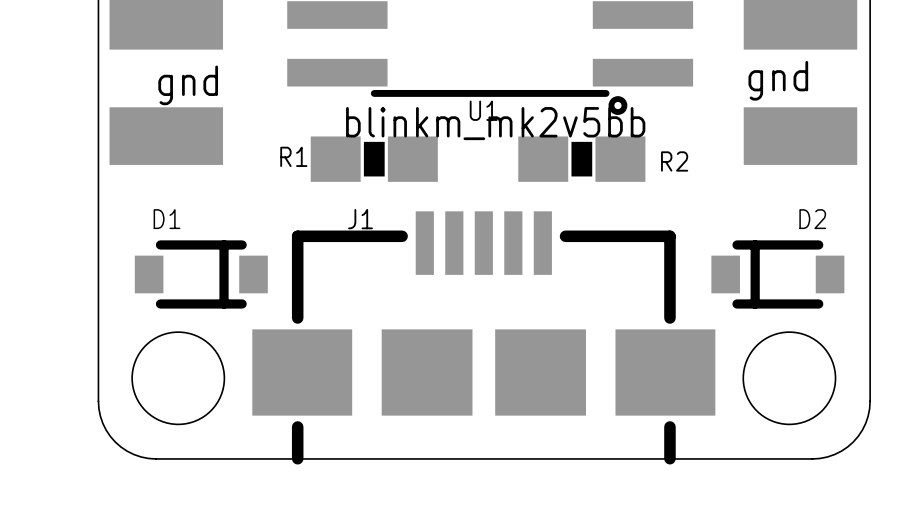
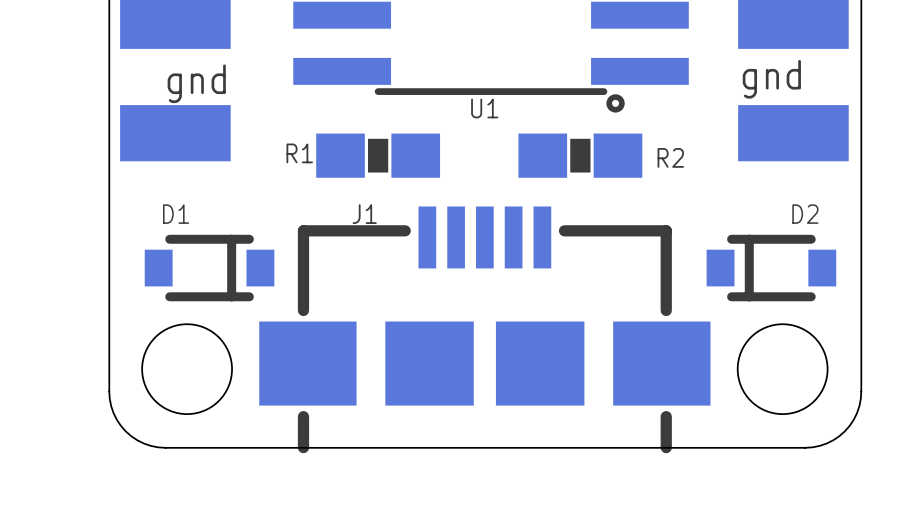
text: blinkm_mk2v5bb (495, 123) -> none

